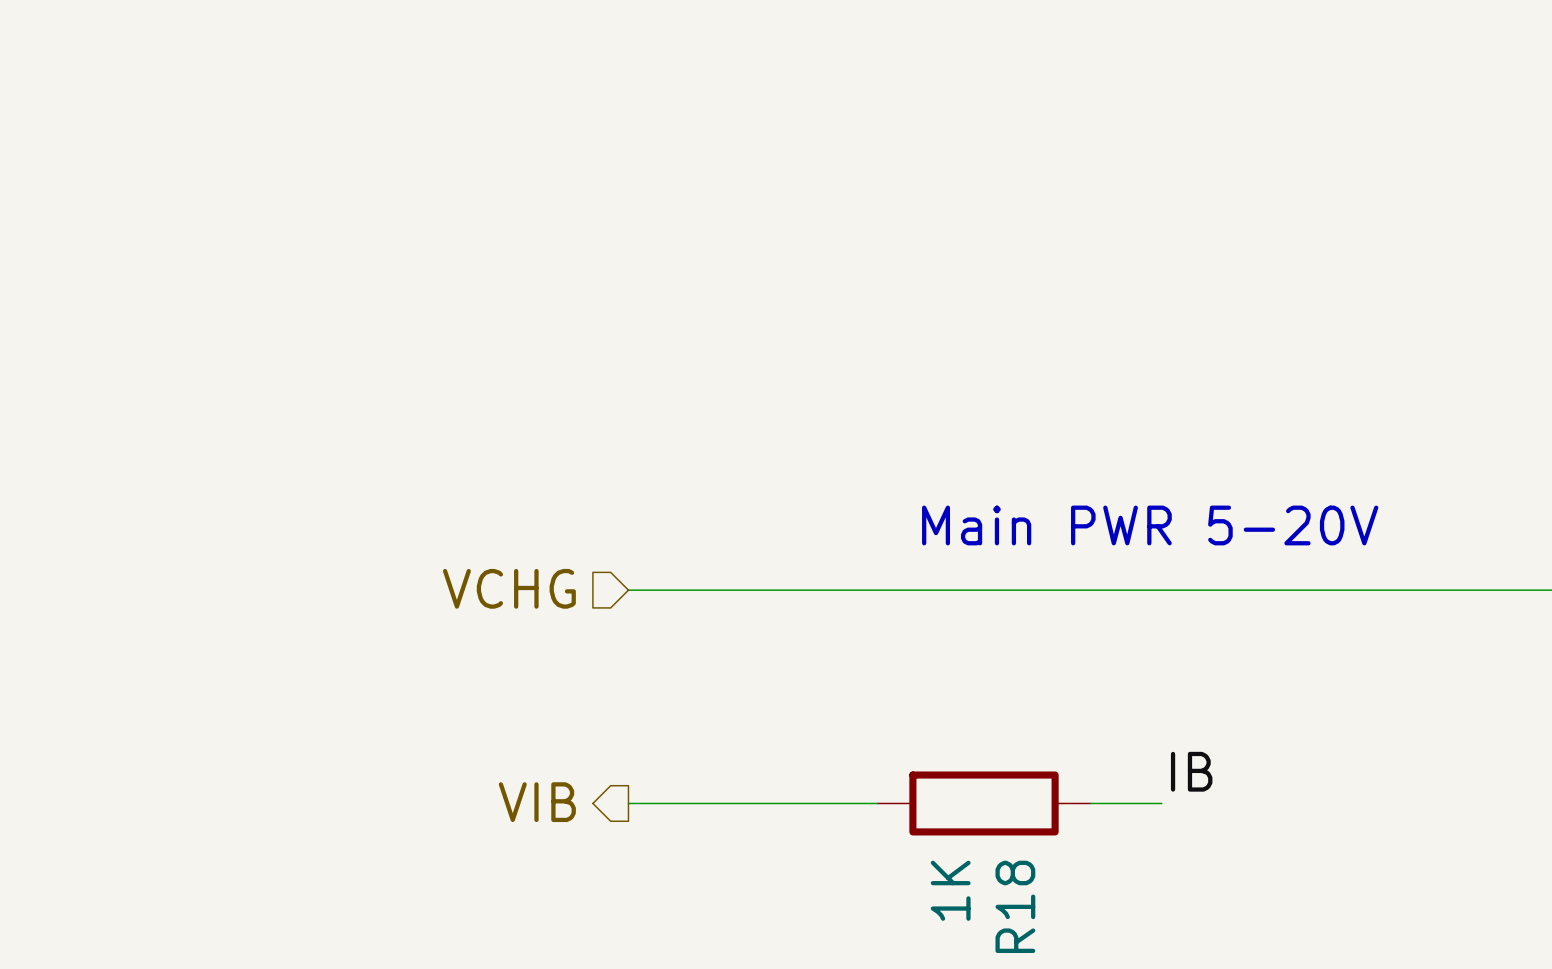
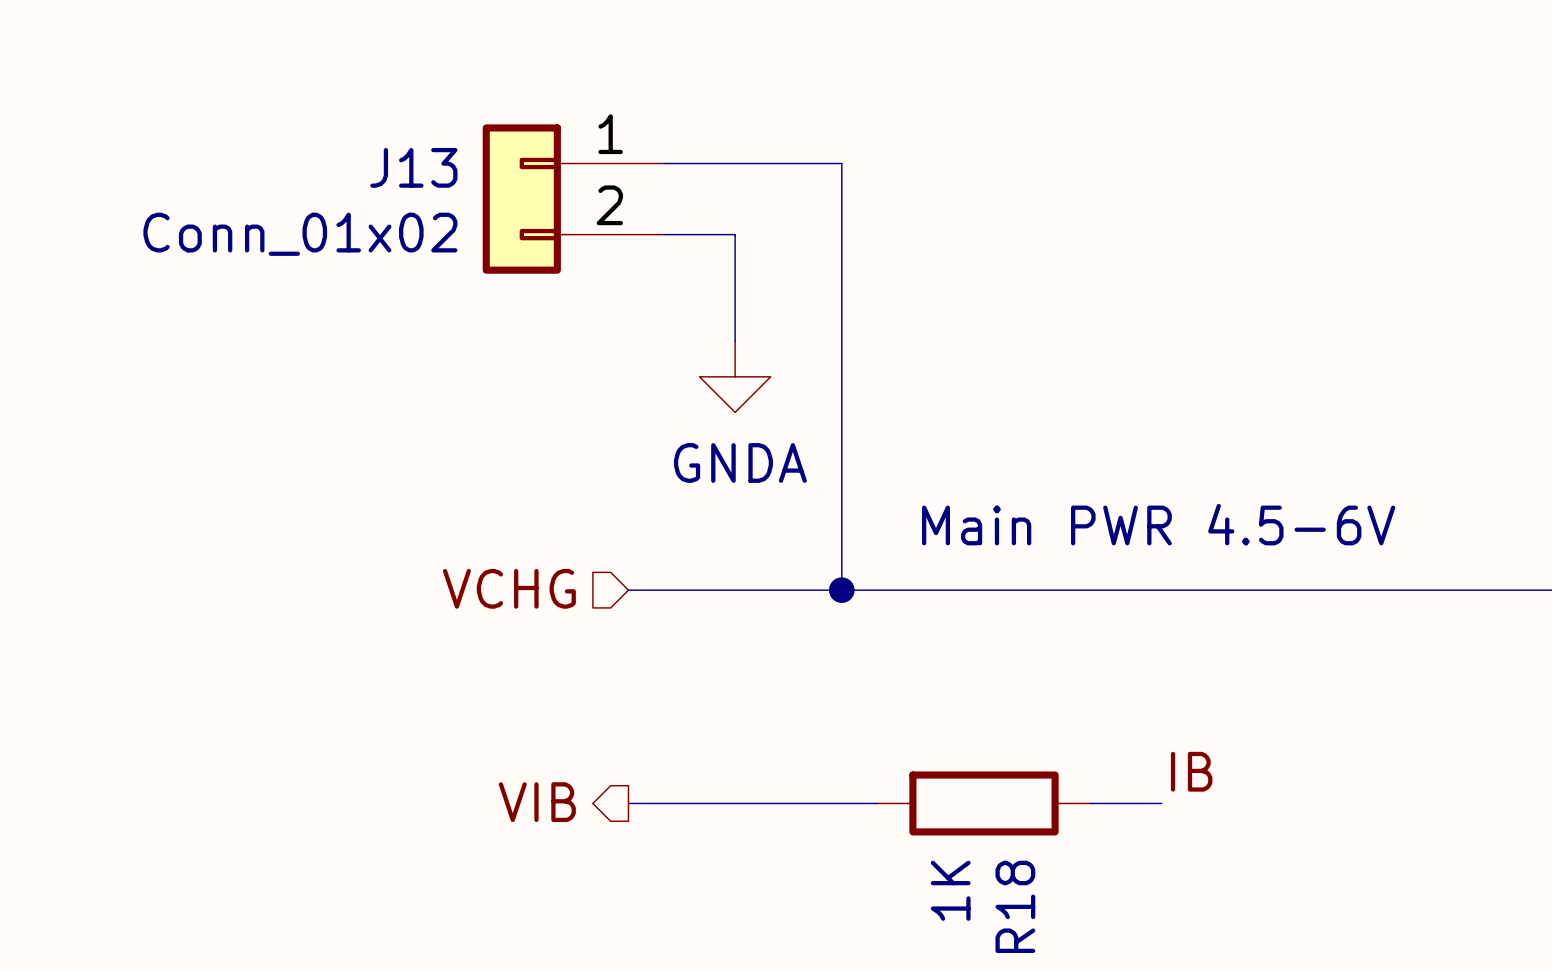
wire: none -> (664, 163) (841, 163) (841, 590)
J13: none -> Conn_01x02 (573, 199)
wire: none -> (664, 234) (735, 234) (735, 341)
power symbol: none -> GNDA (735, 376)
text: Main PWR 5-20V (1150, 525) -> Main PWR 4.5-6V (1158, 524)
junction: none -> (841, 590)

